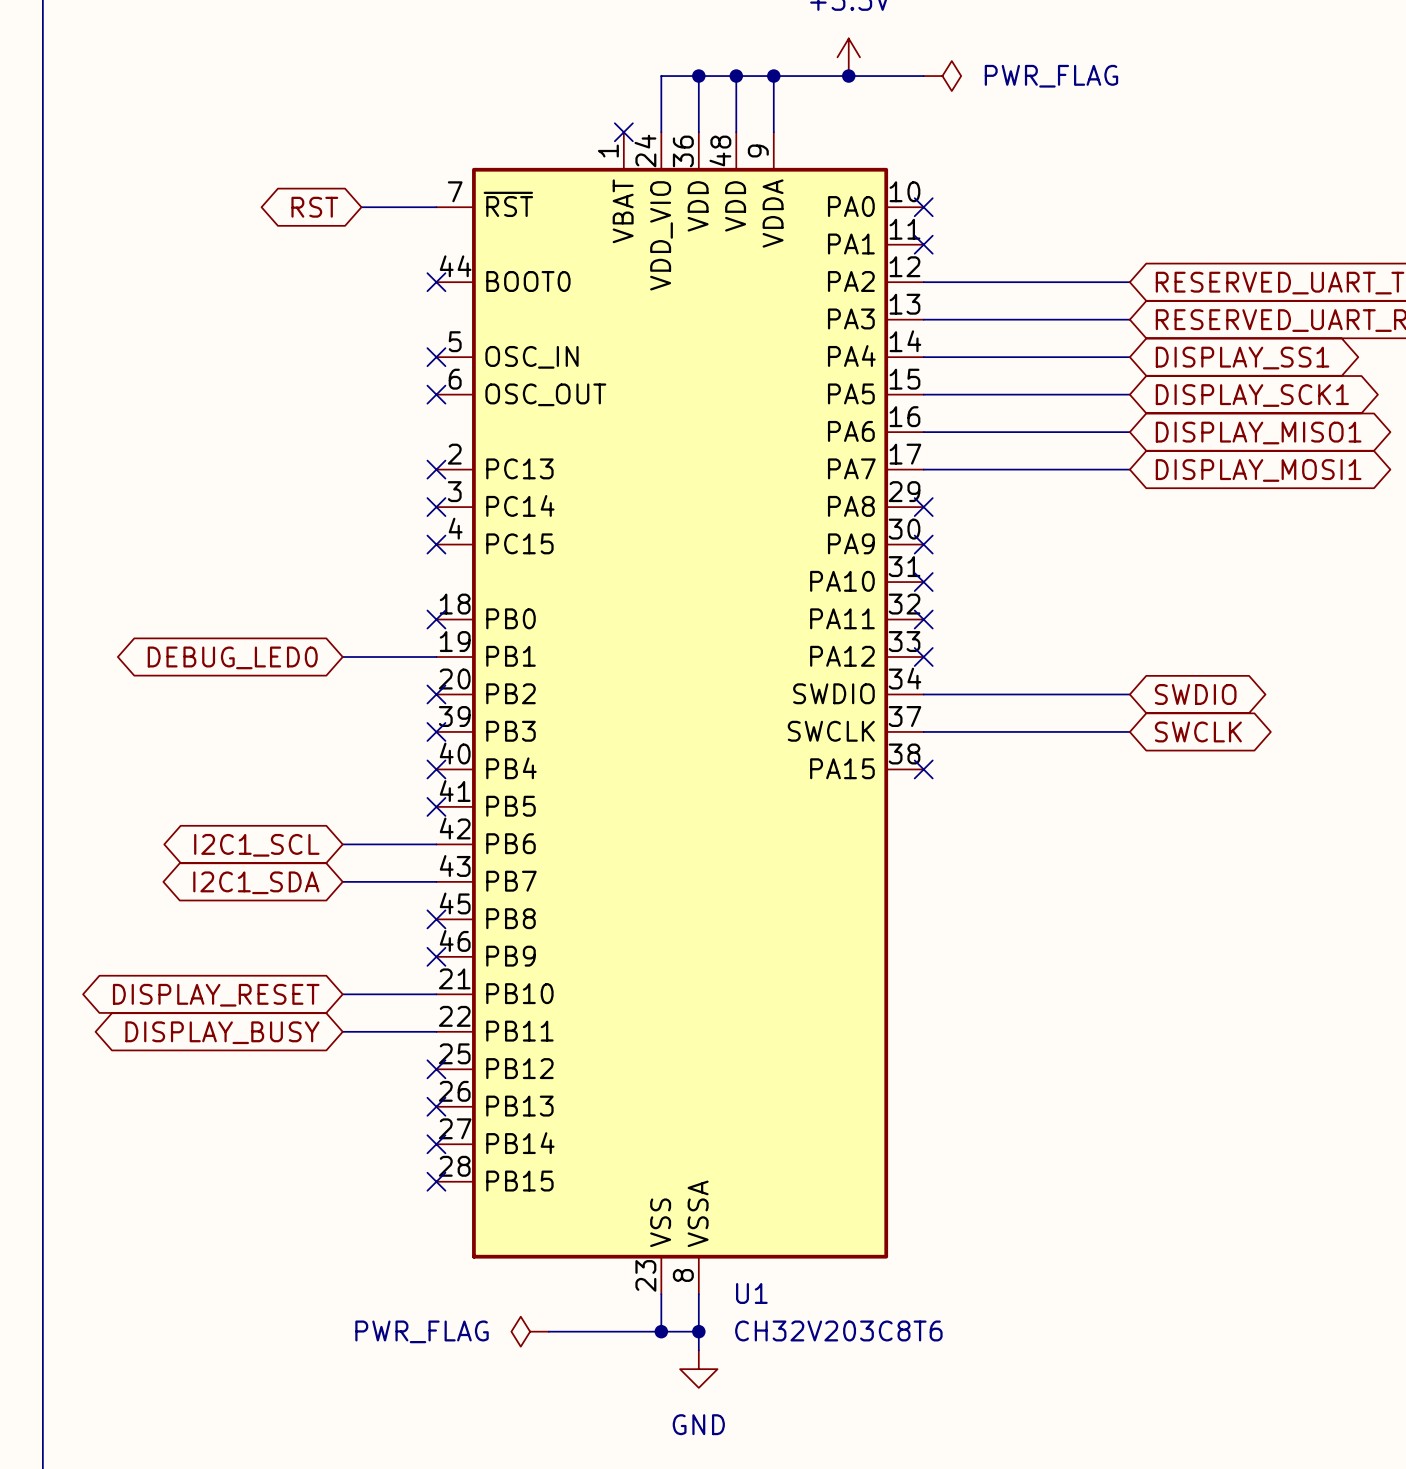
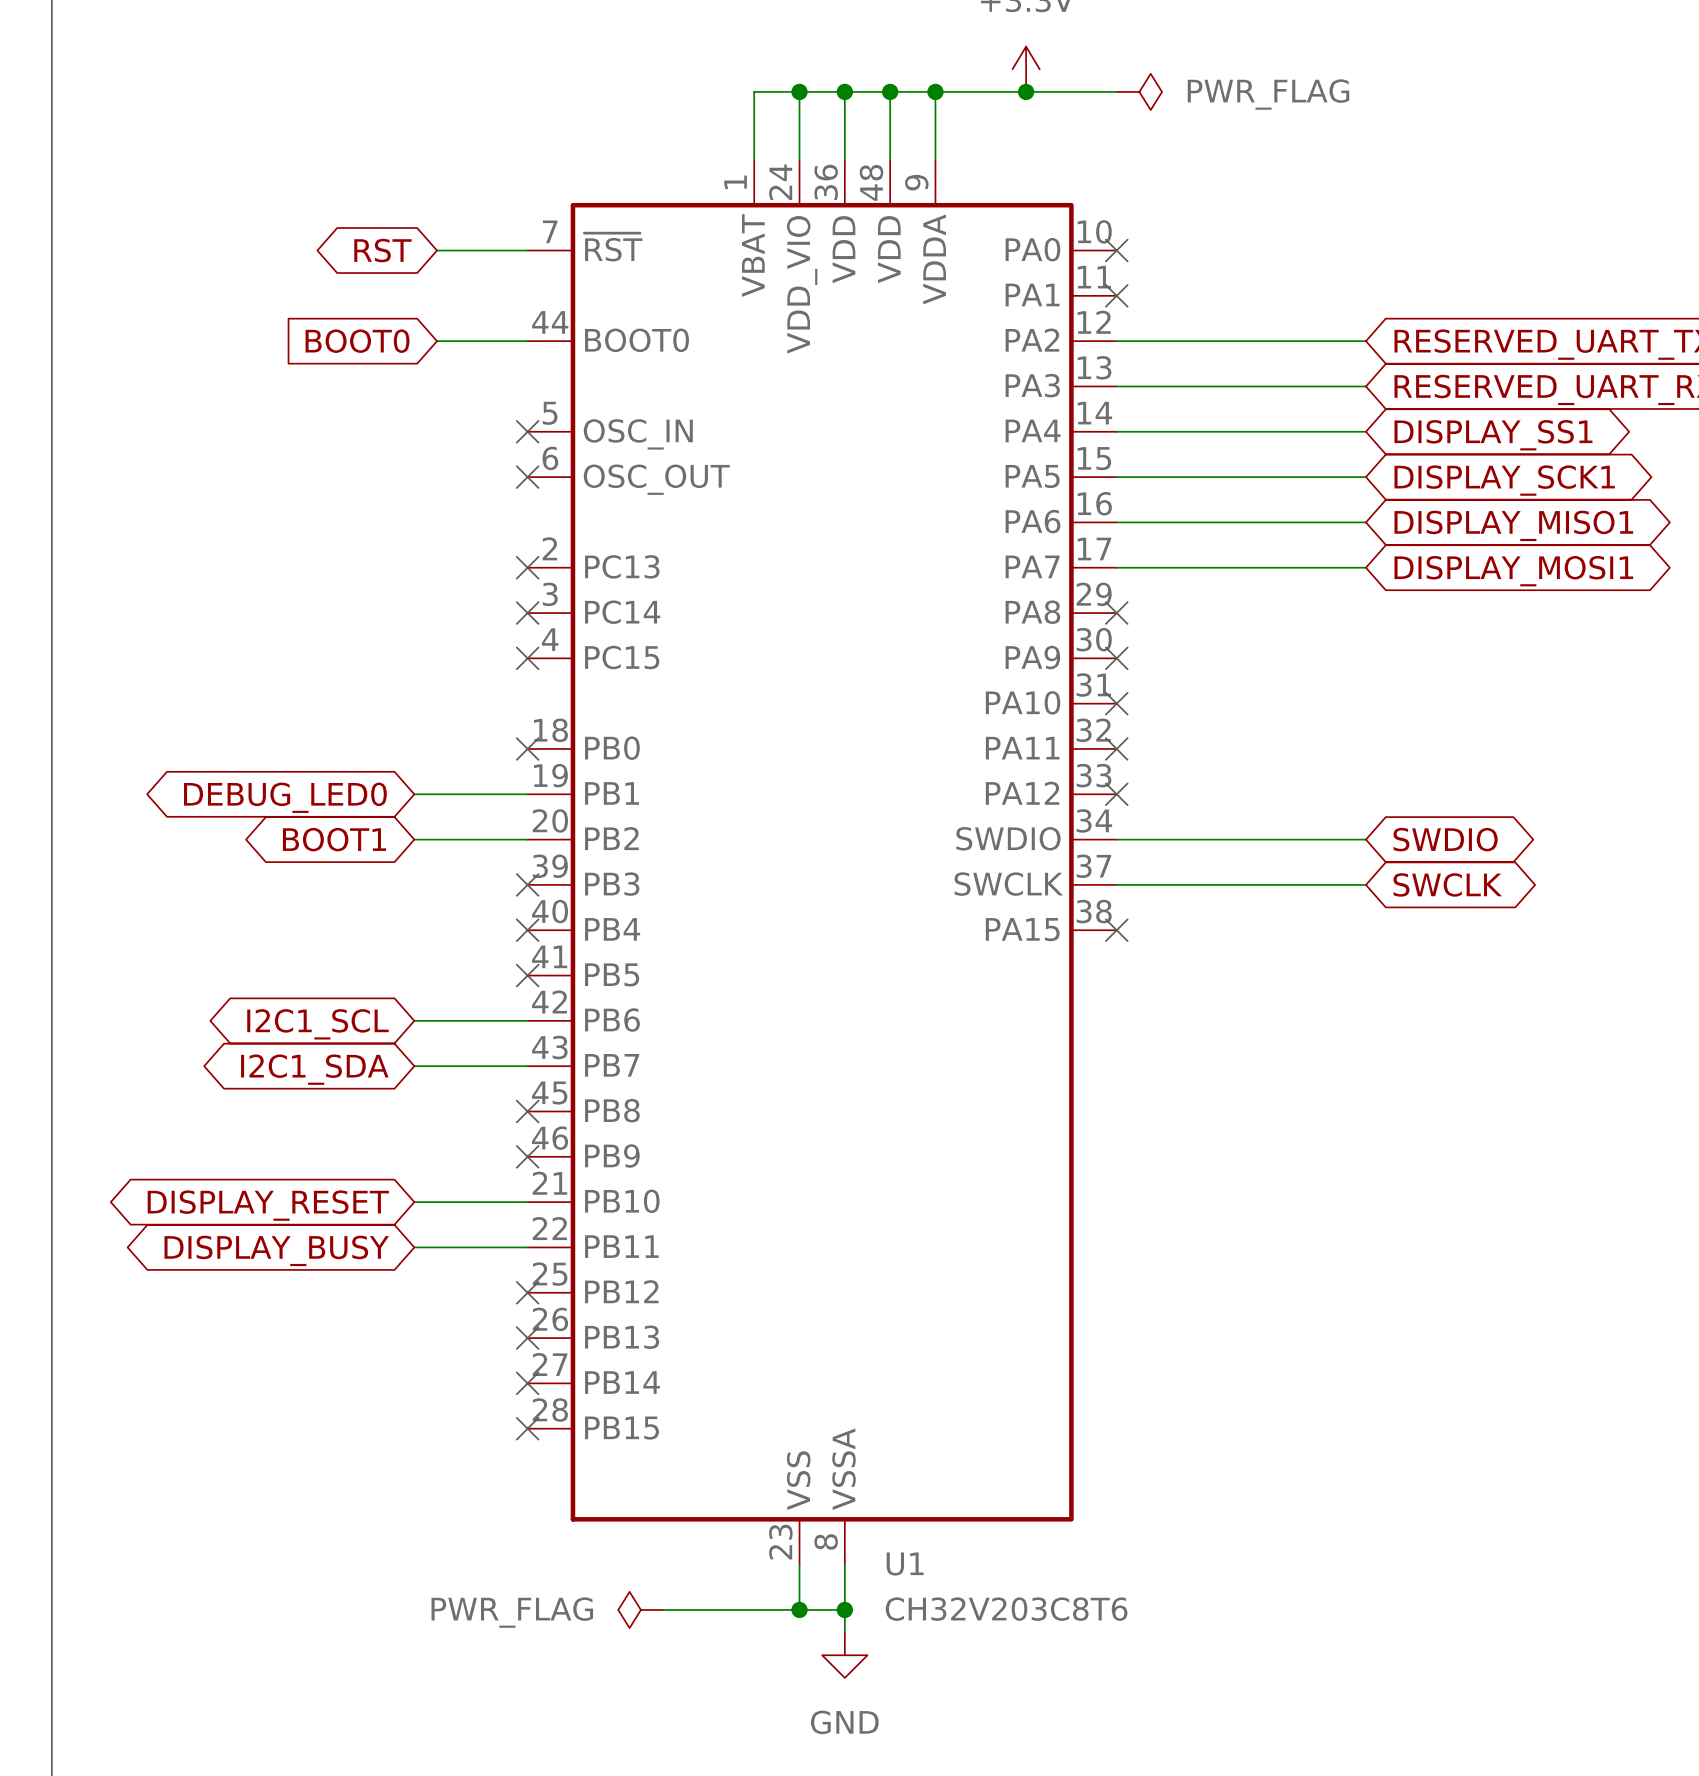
wire: none -> (799, 91) (754, 91) (754, 159)
junction: none -> (799, 91)
no-connect mark: (623, 132) -> none
global label: none -> BOOT0 (357, 341)
wire: none -> (437, 341) (527, 341)
no-connect mark: (436, 282) -> none
global label: none -> BOOT1 (334, 839)
wire: none -> (414, 839) (527, 839)
no-connect mark: (436, 694) -> none

